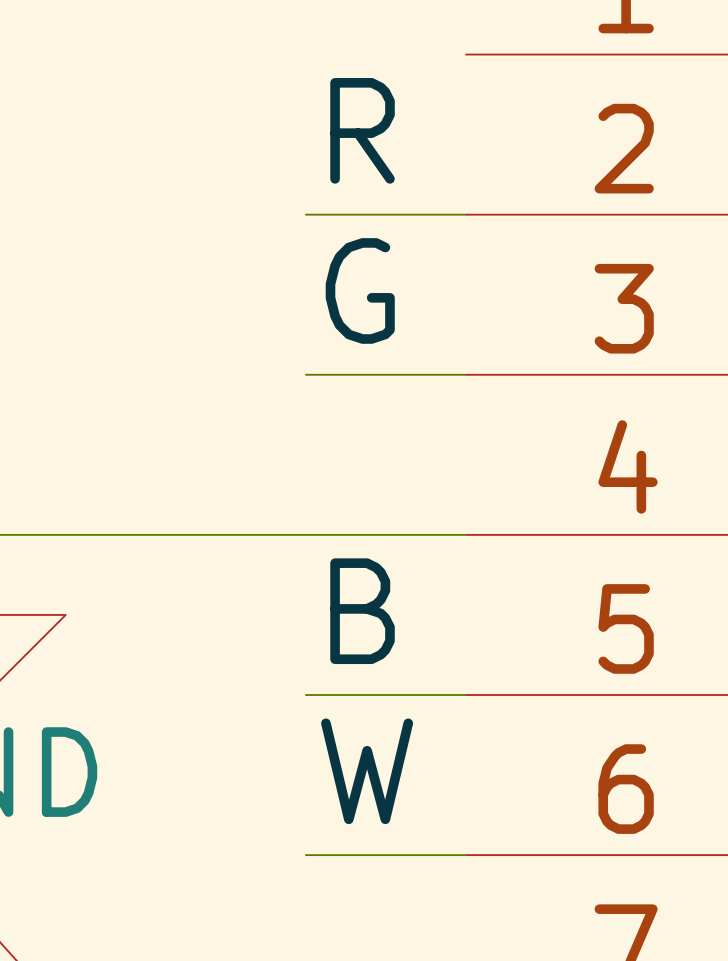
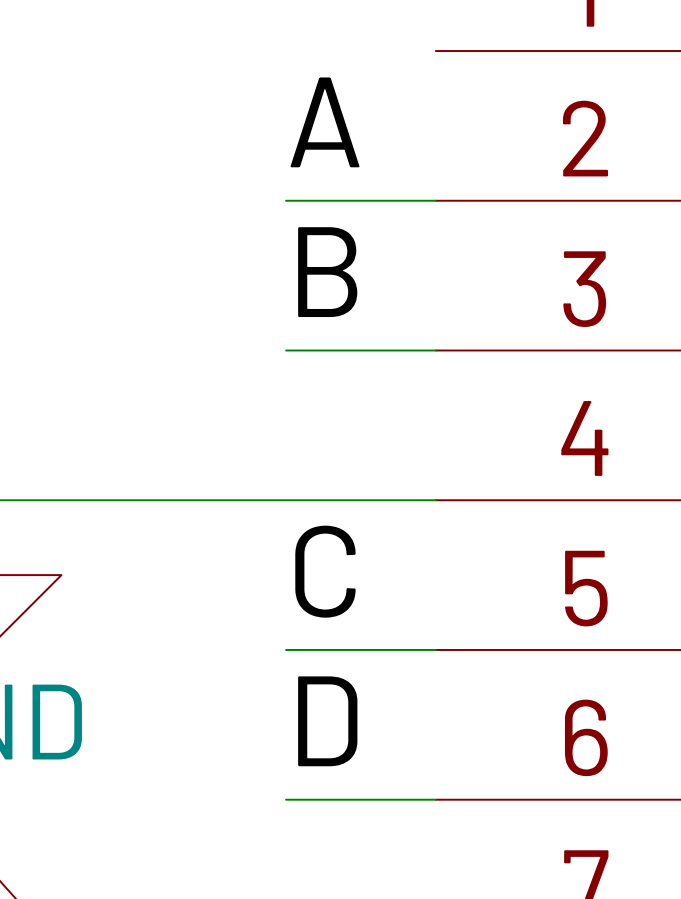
label: R (362, 130) -> A (324, 122)
label: G (360, 290) -> B (327, 272)
label: B (362, 611) -> C (325, 571)
label: W (367, 771) -> D (327, 721)

